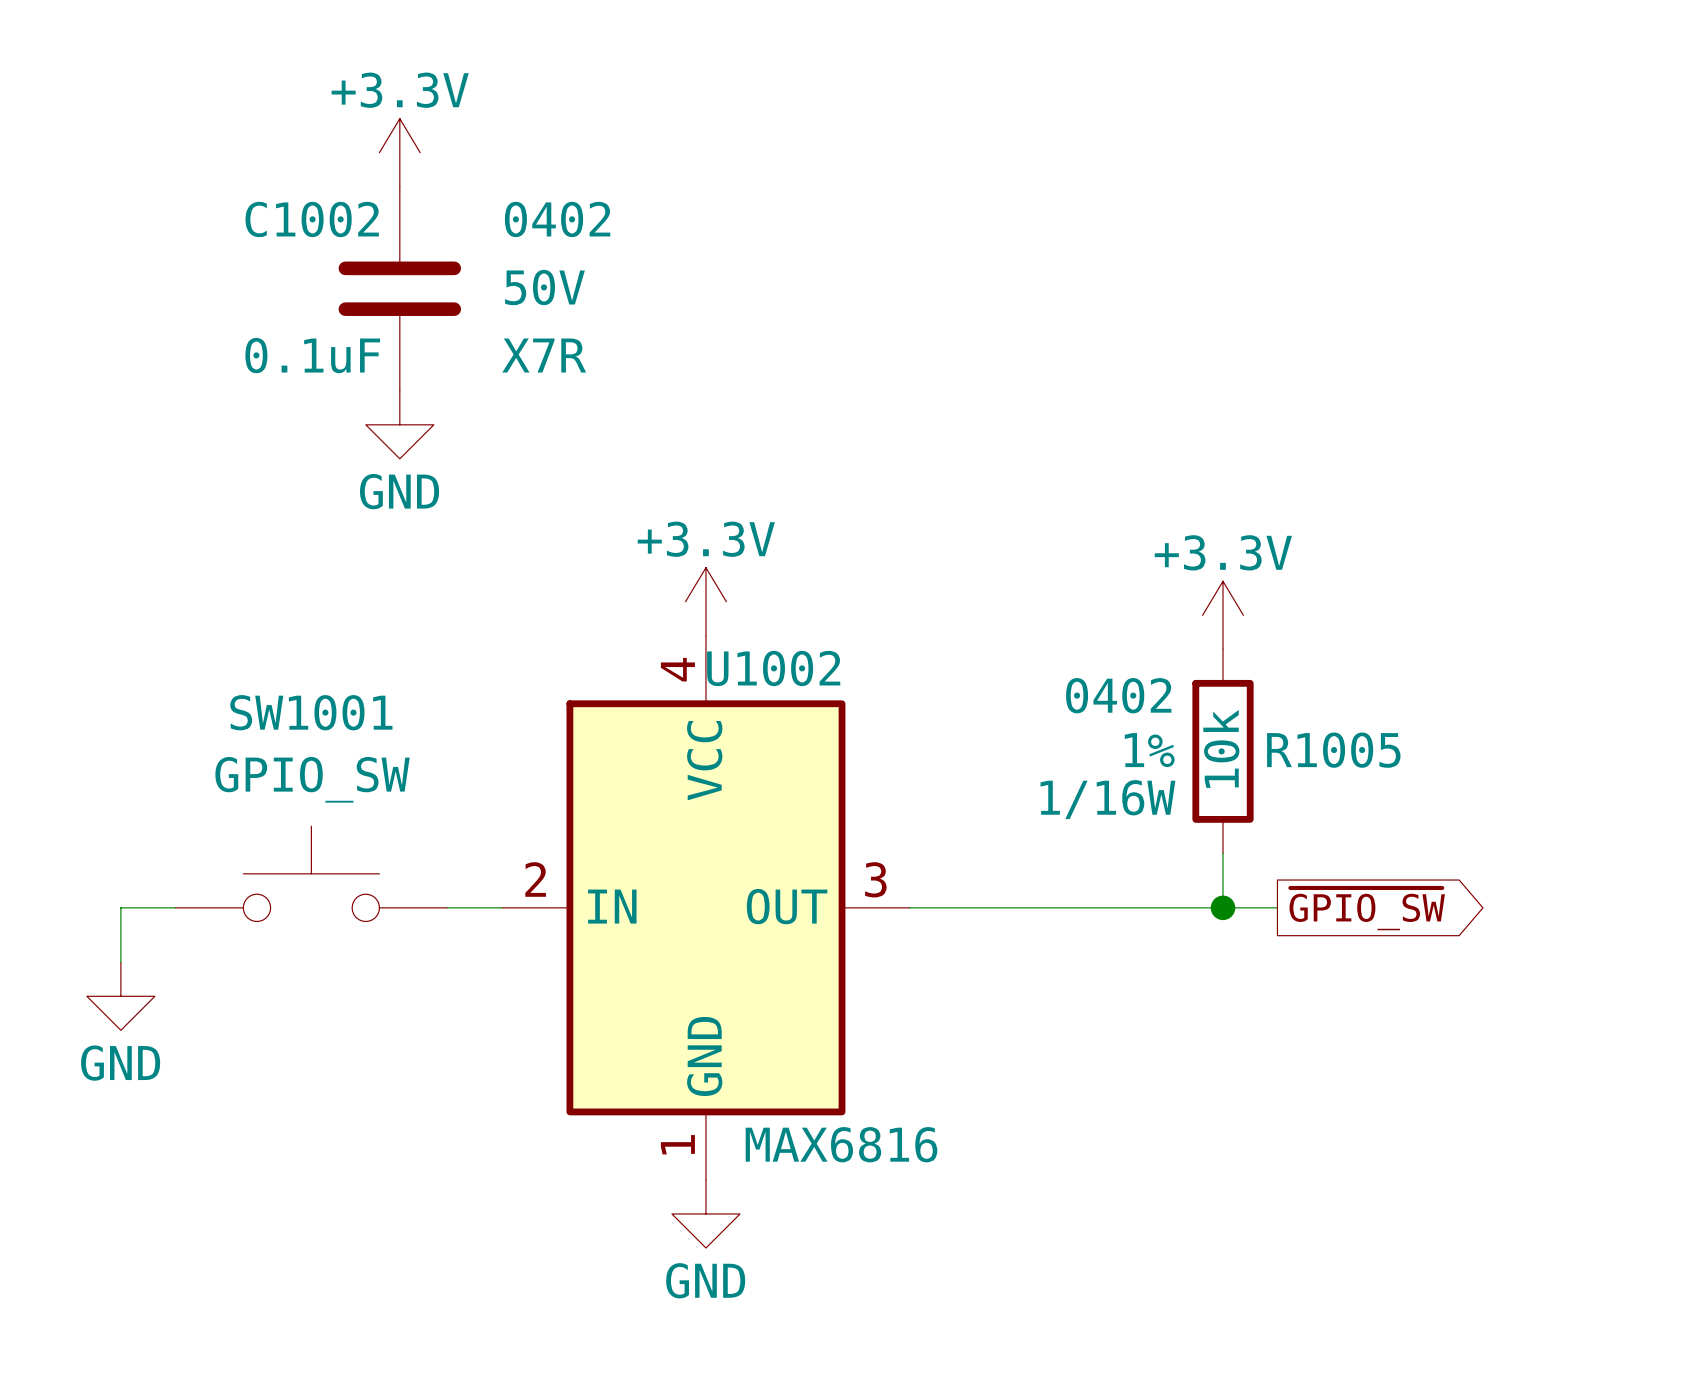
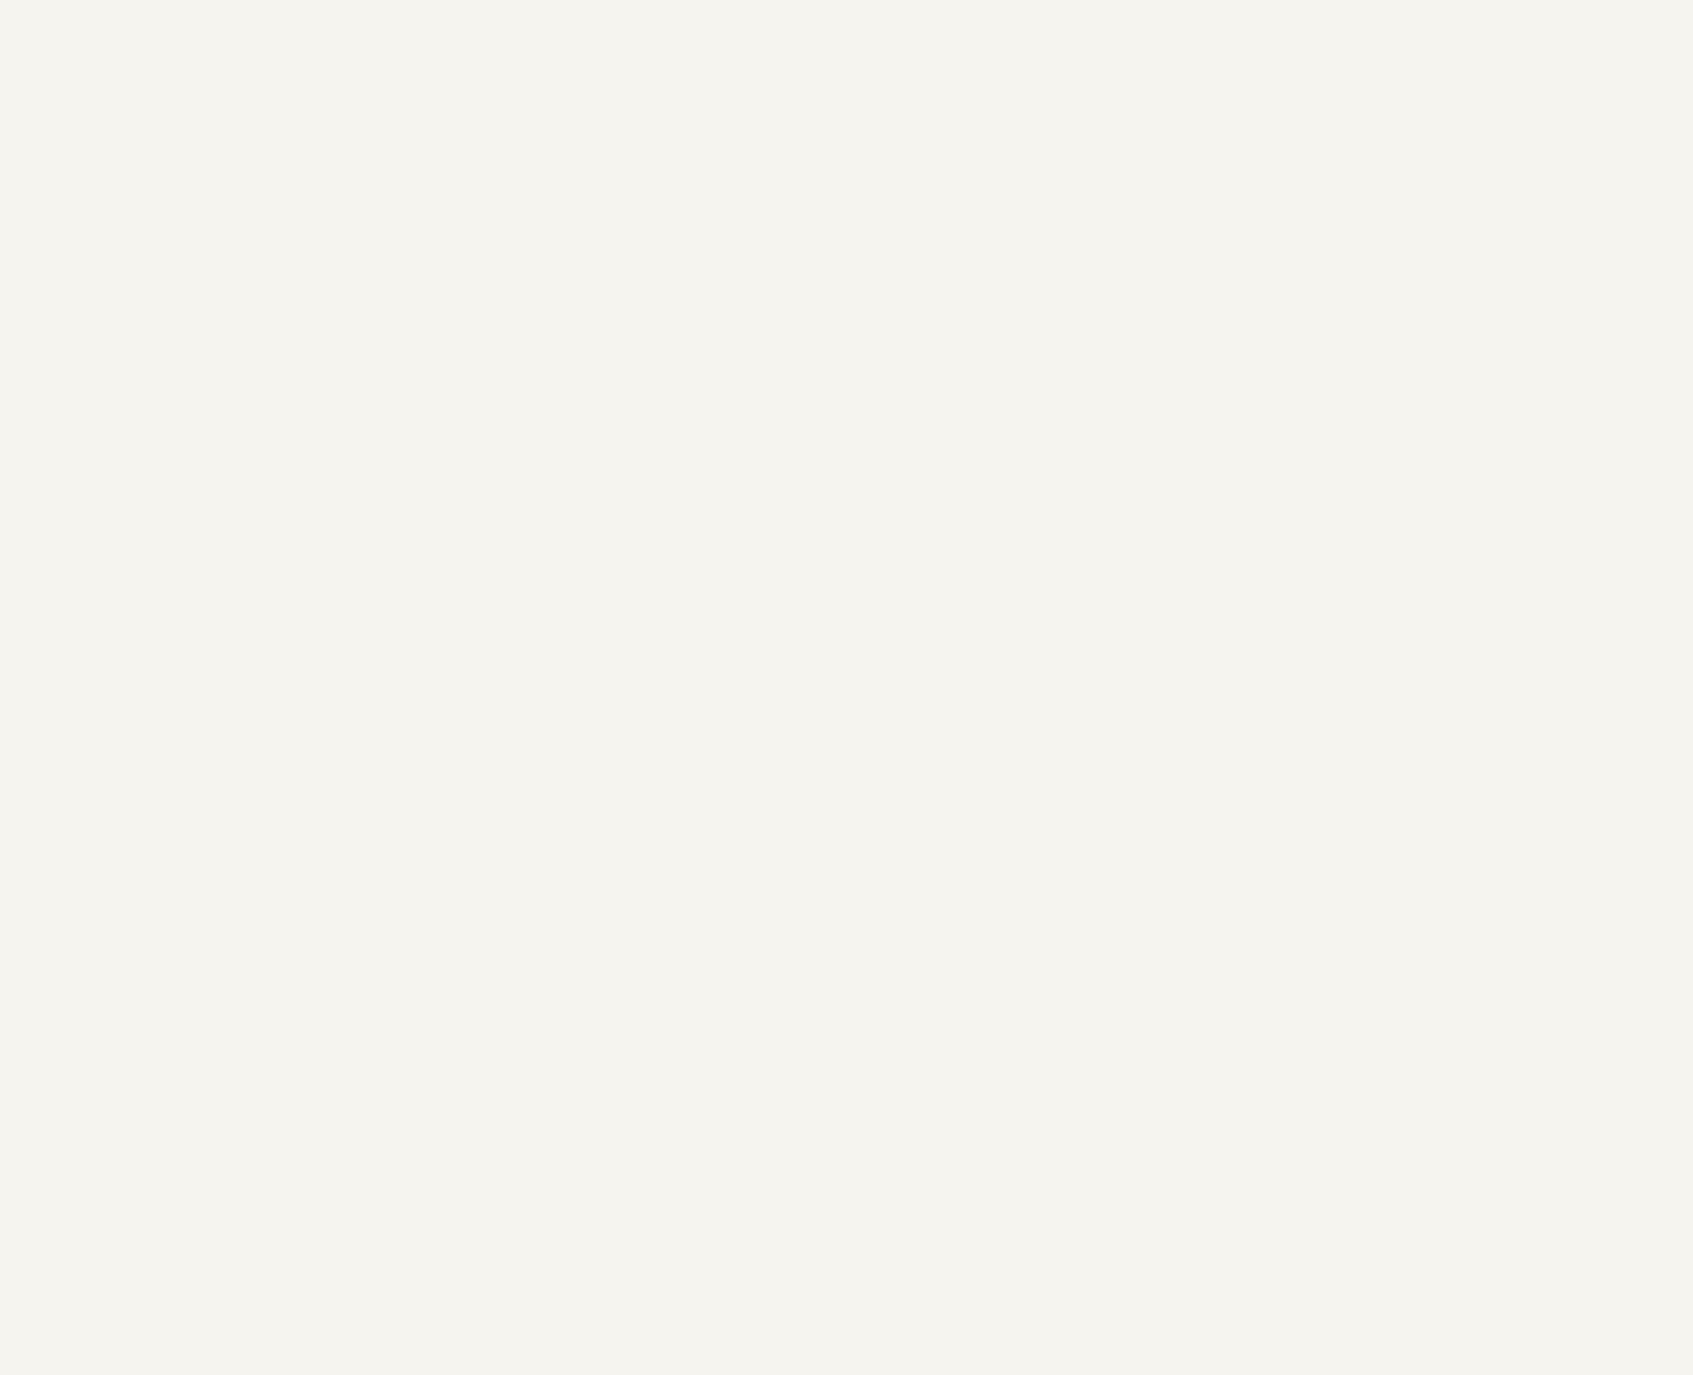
power symbol: +3.3V (399, 152) -> none
C1002: 0.1uF (399, 288) -> none
power symbol: GND (399, 424) -> none
power symbol: +3.3V (705, 601) -> none
power symbol: +3.3V (1223, 615) -> none
R1005: 10k (1223, 751) -> none
wire: (1223, 853) (1223, 907) -> none
SW1001: GPIO_SW (311, 873) -> none
wire: (175, 907) (120, 907) (120, 962) -> none
wire: (447, 907) (501, 907) -> none
U1002: MAX6816 (705, 907) -> none
wire: (910, 907) (1277, 907) -> none
junction: (1223, 907) -> none
global label: ~{GPIO_SW} (1367, 909) -> none
power symbol: GND (120, 996) -> none
power symbol: GND (705, 1213) -> none

